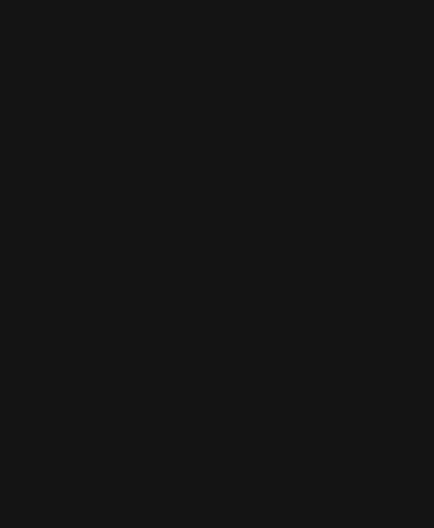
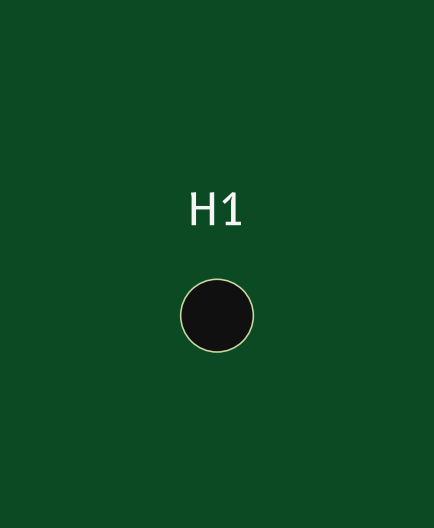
H1: none -> (217, 315)

